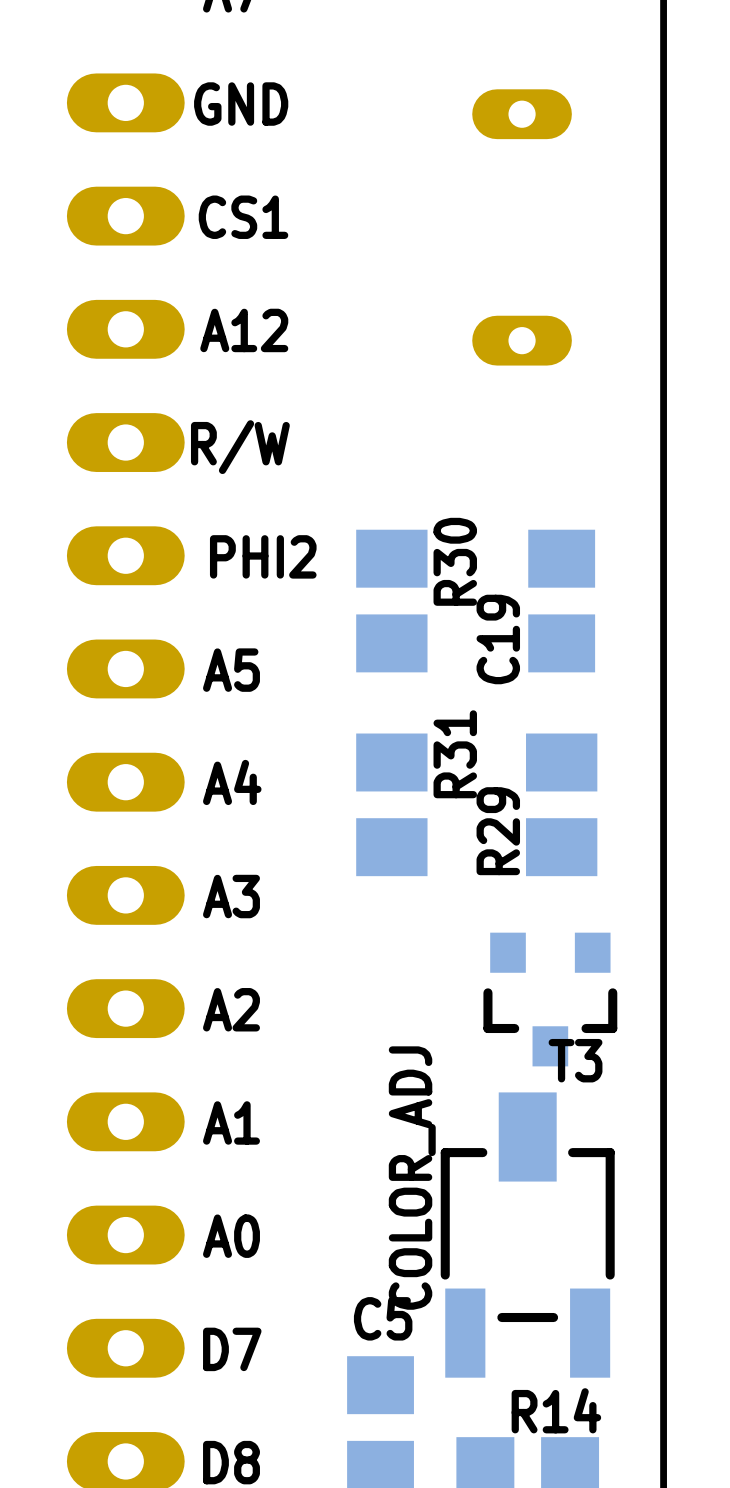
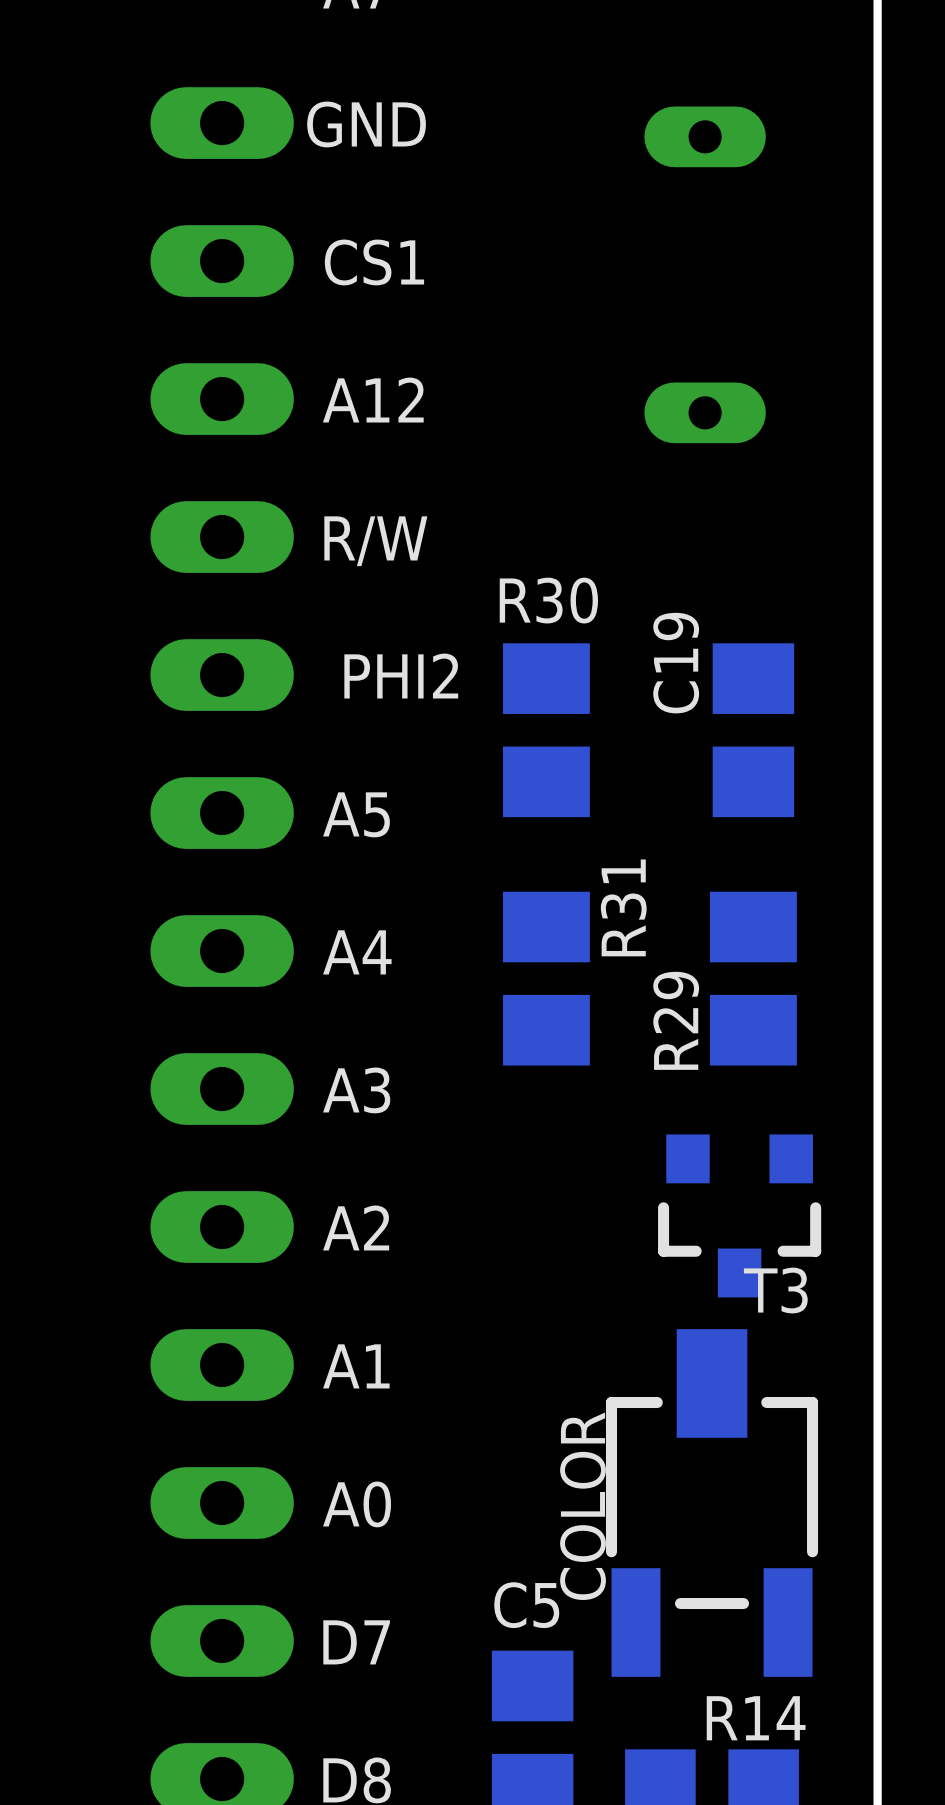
R30 name rotation: 0° (455, 561) -> 90° clockwise (548, 600)
C19 name position: C19 (498, 639) -> C19 (676, 663)
COLOR_ADJ name: COLOR_ADJ (412, 1178) -> COLOR (583, 1506)

